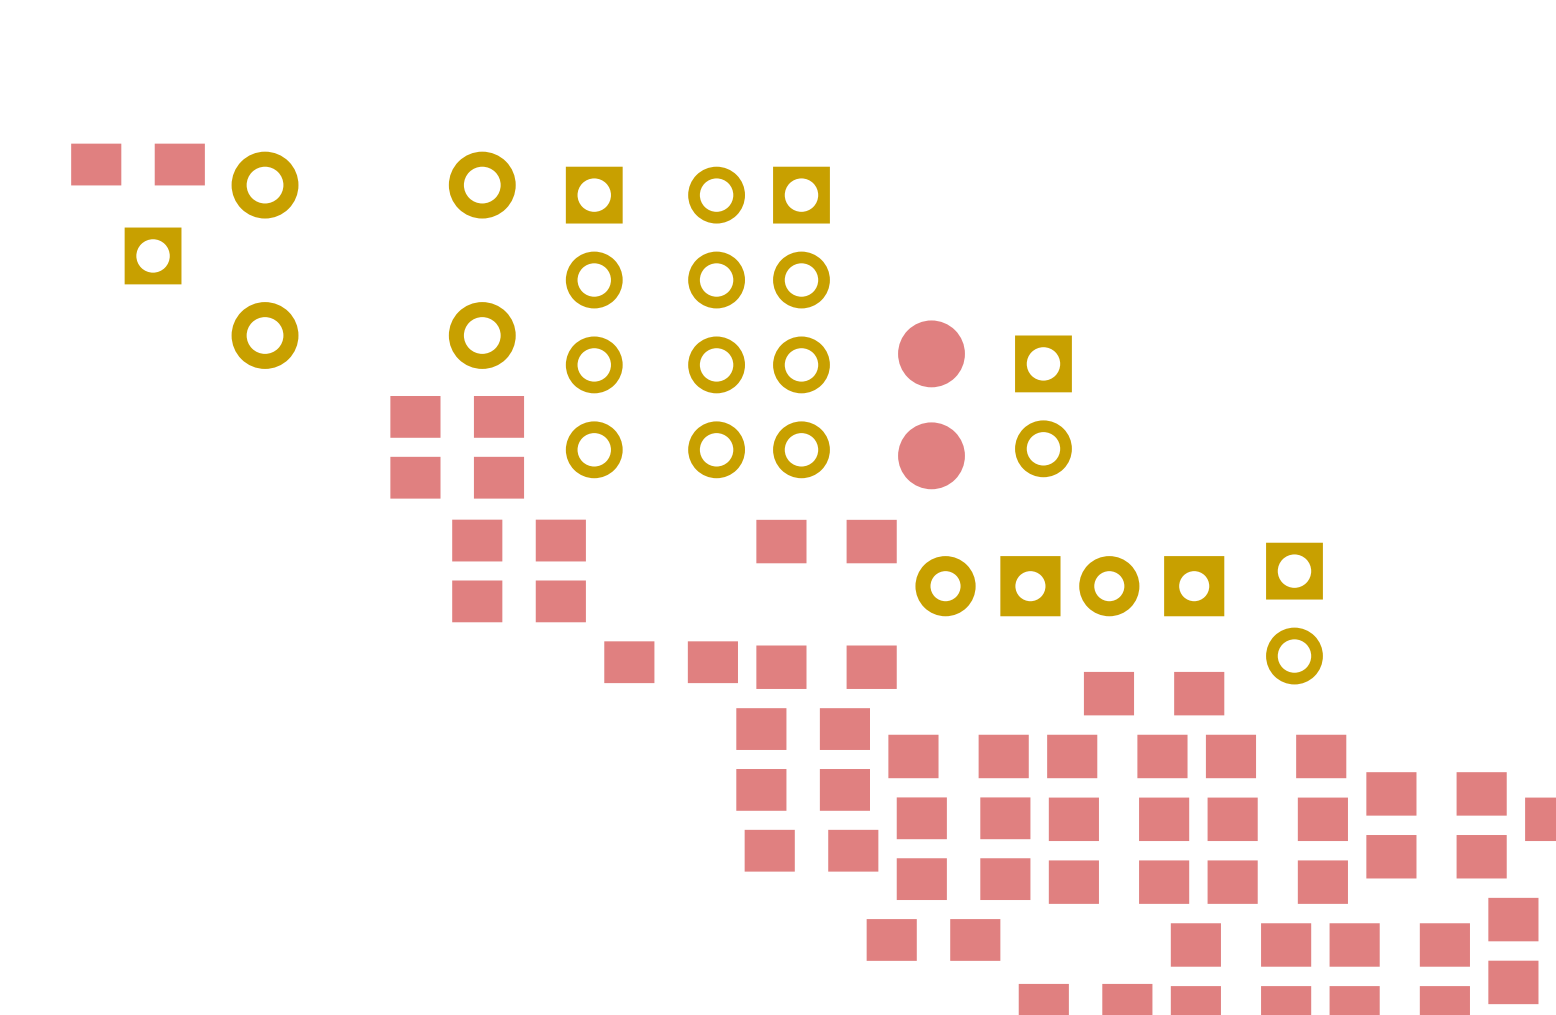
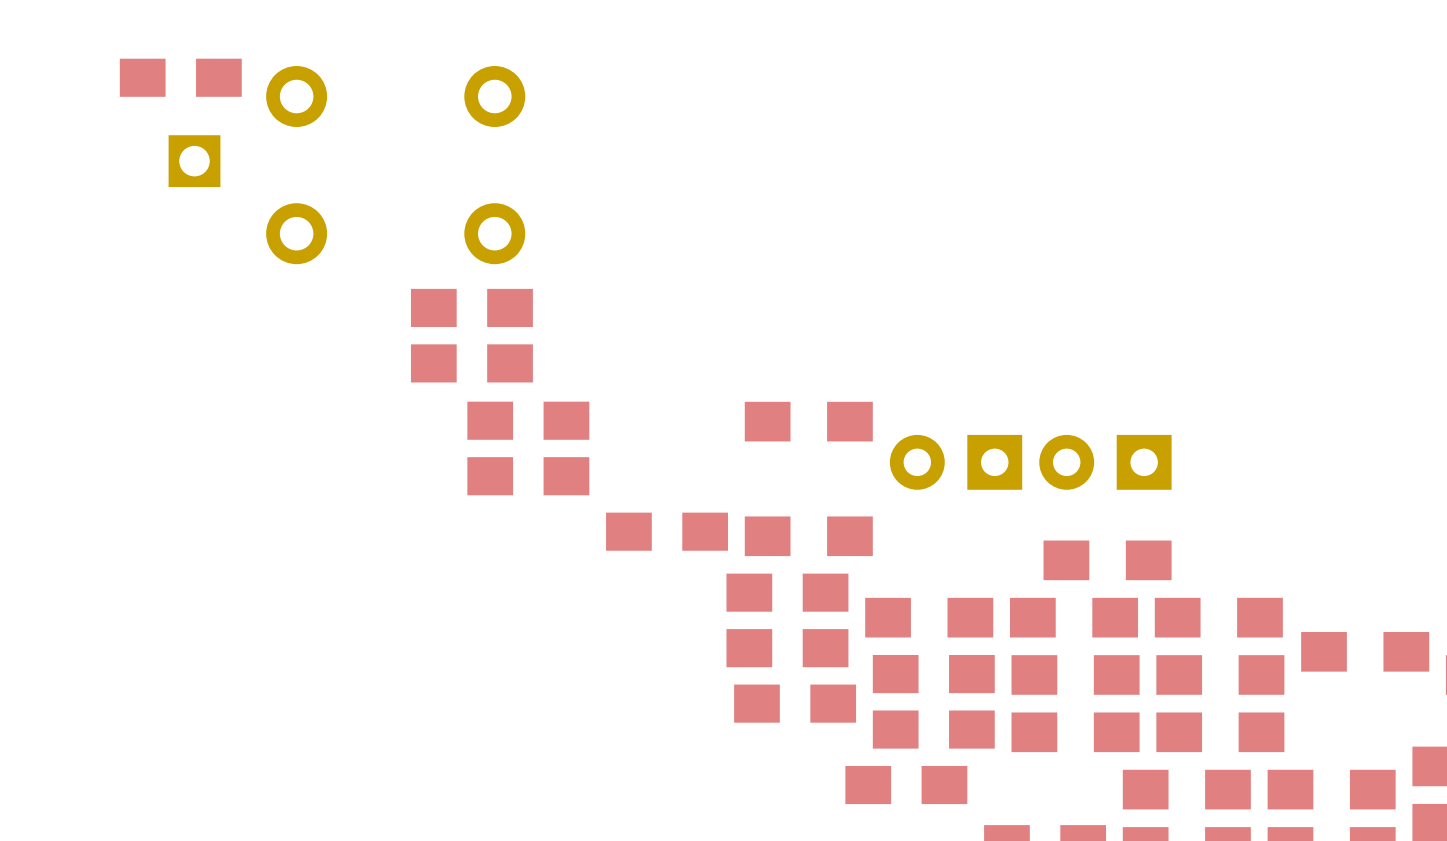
part: (594, 322) -> none
part: (759, 322) -> none
part: (931, 353) -> none
part: (1043, 406) -> none
part: (931, 455) -> none
part: (1294, 613) -> none
part: (1436, 856) -> none

